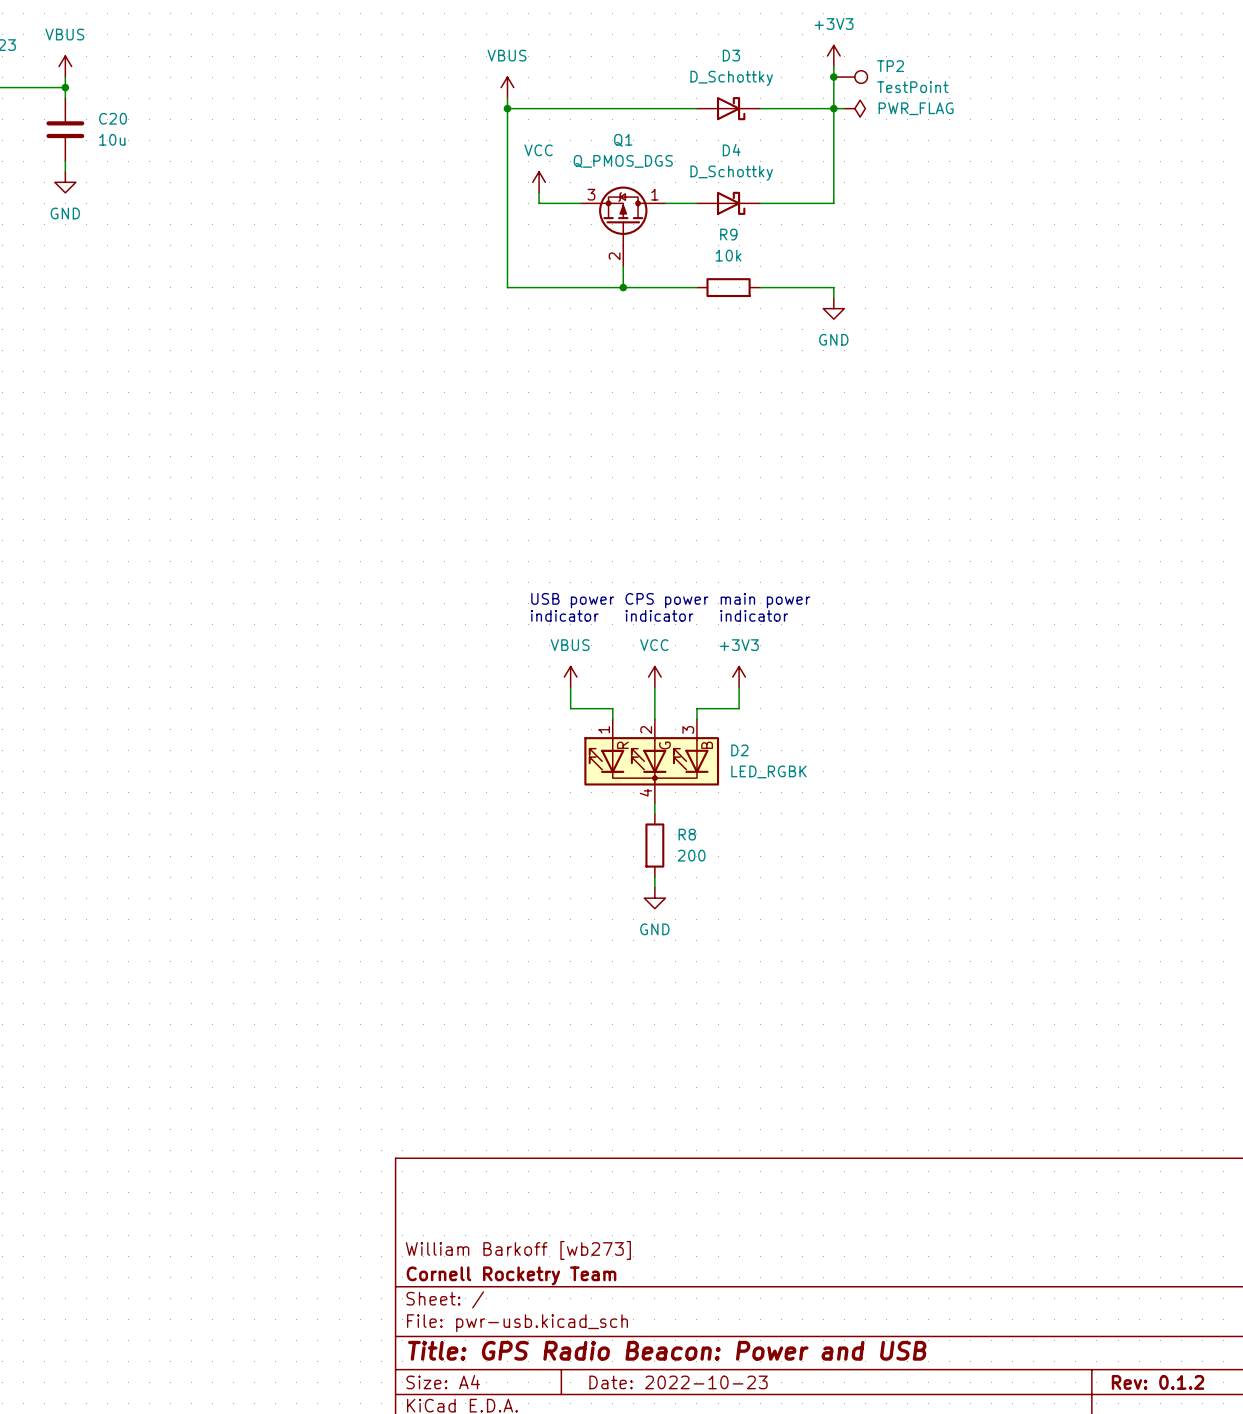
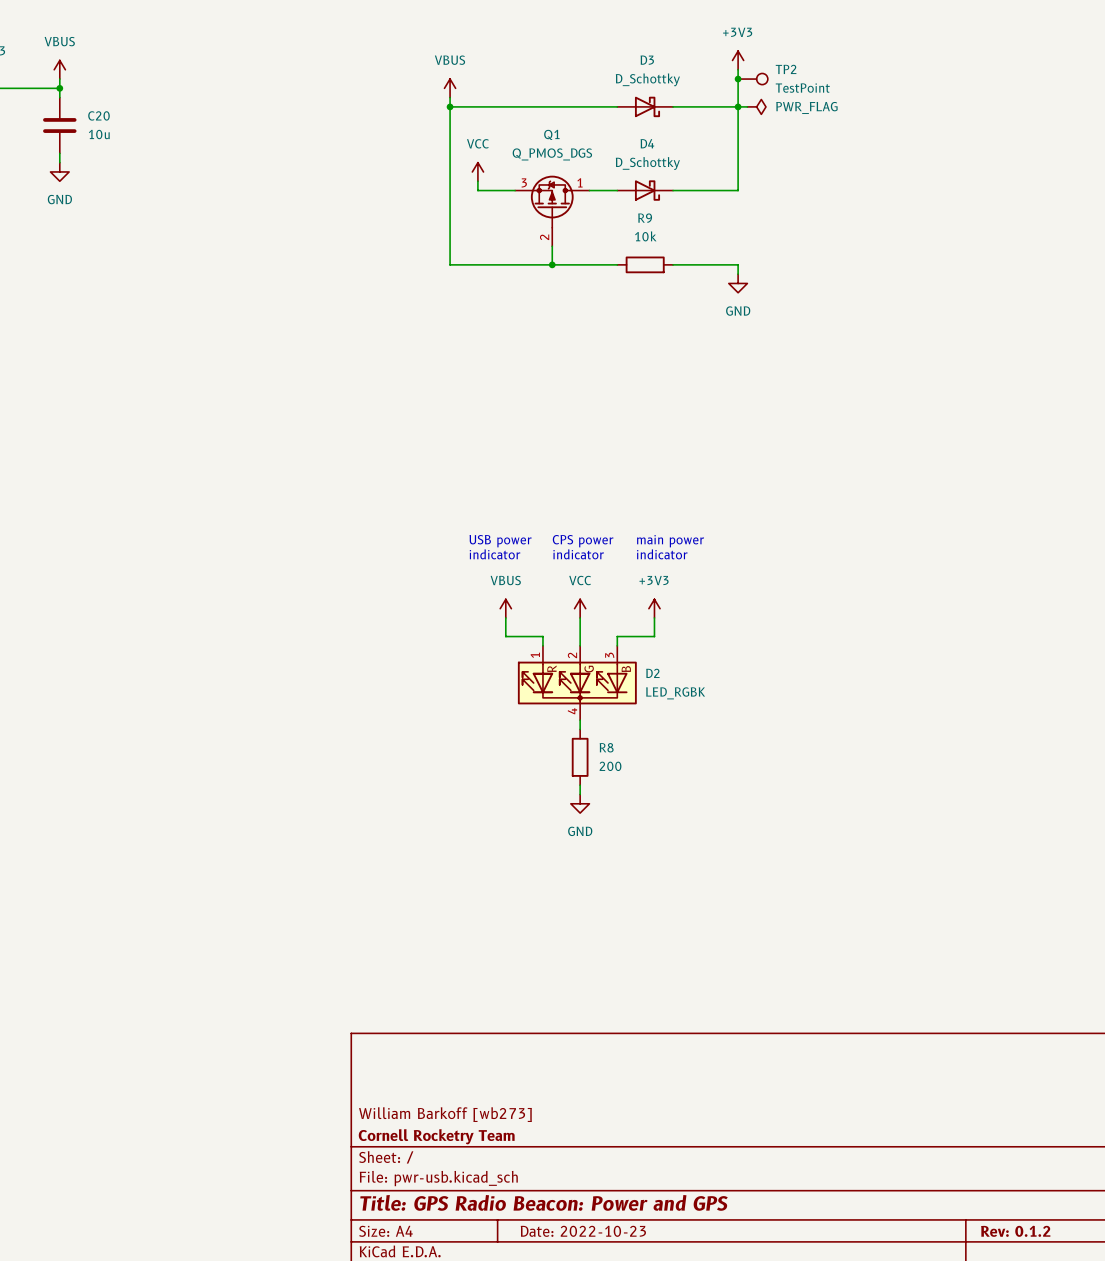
title block: Title: GPS Radio Beacon: Power and USB (667, 1350) -> Title: GPS Radio Beacon: Power and GPS (544, 1202)

